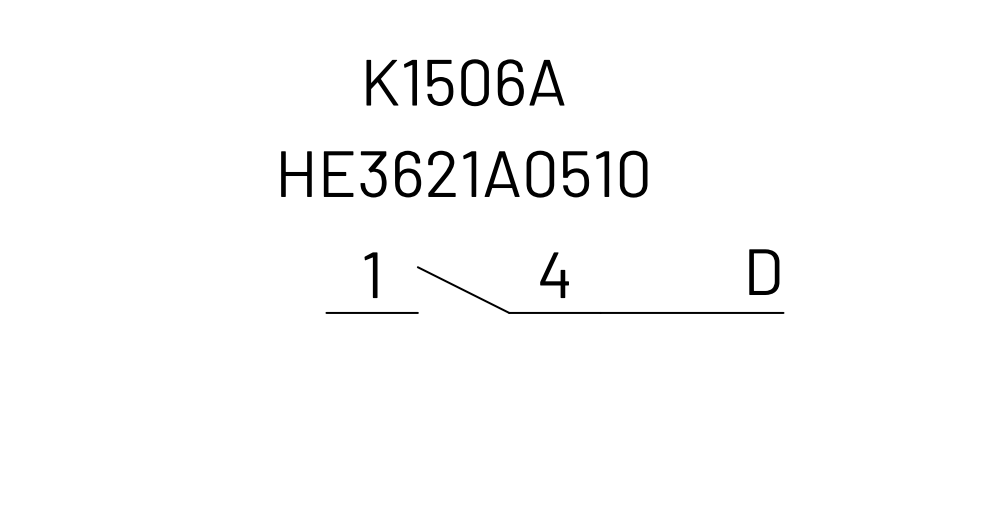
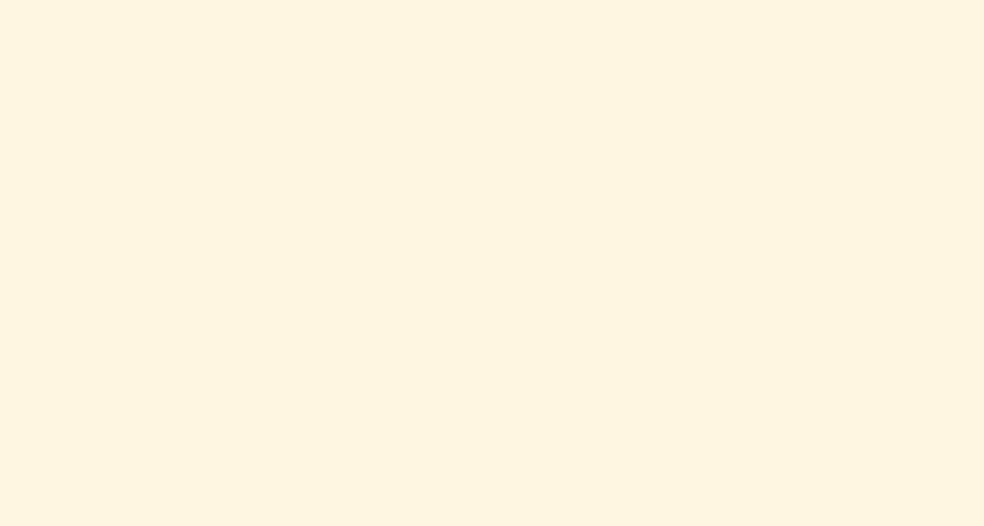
label: D (764, 272) -> none
K1506A: HE3621A0510 (463, 290) -> none
wire: (600, 312) (783, 312) -> none

